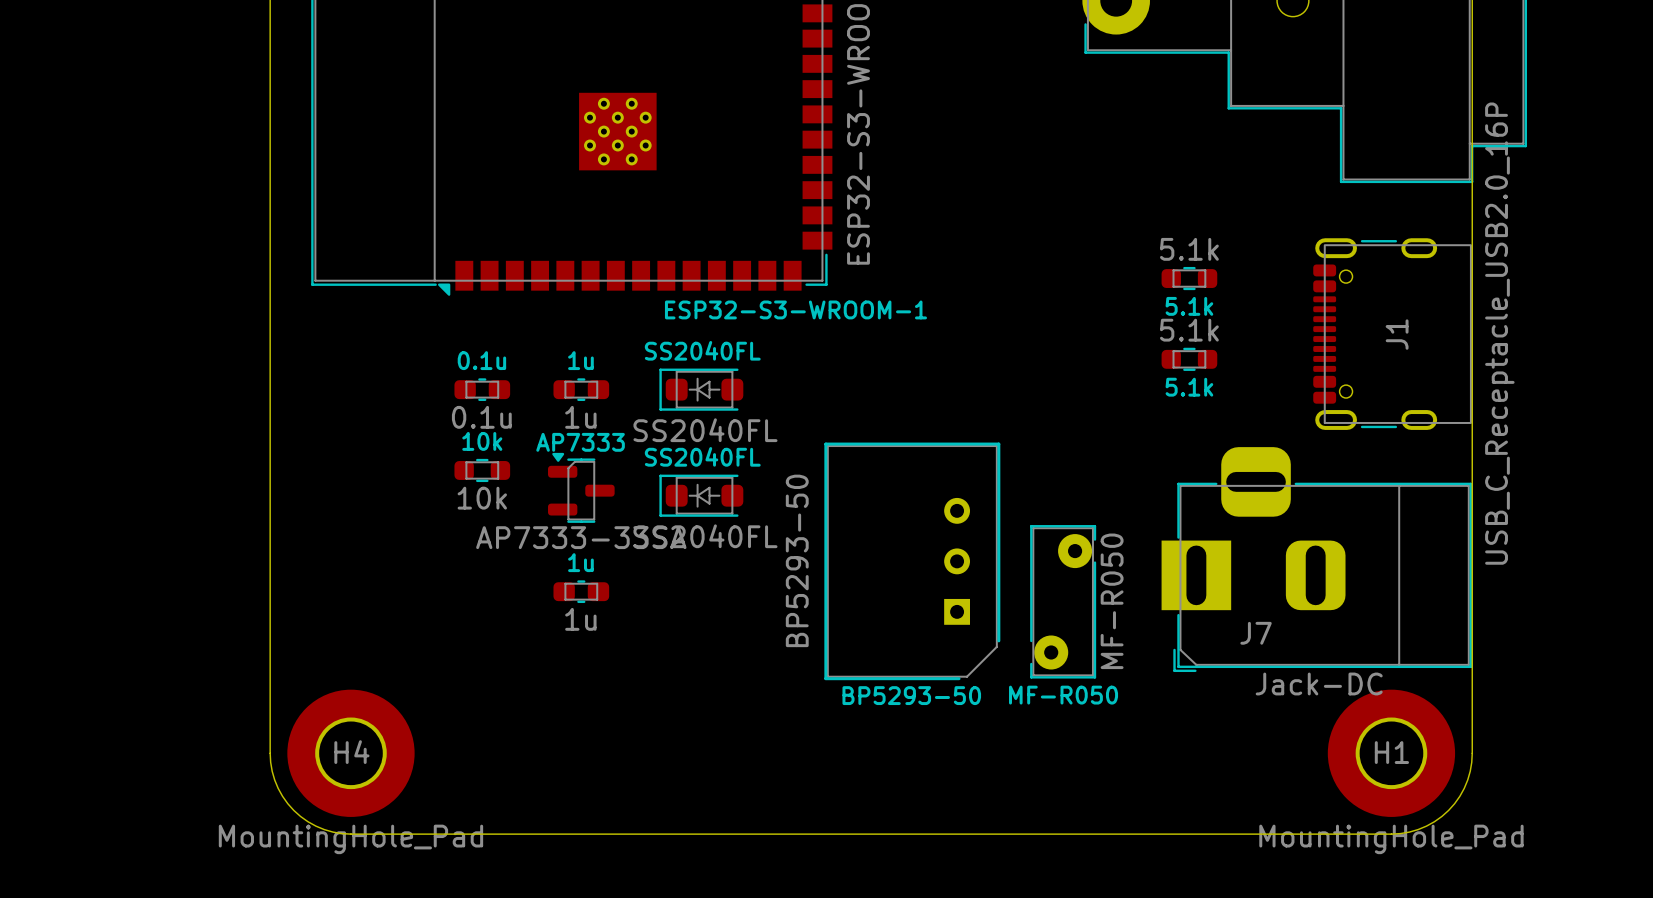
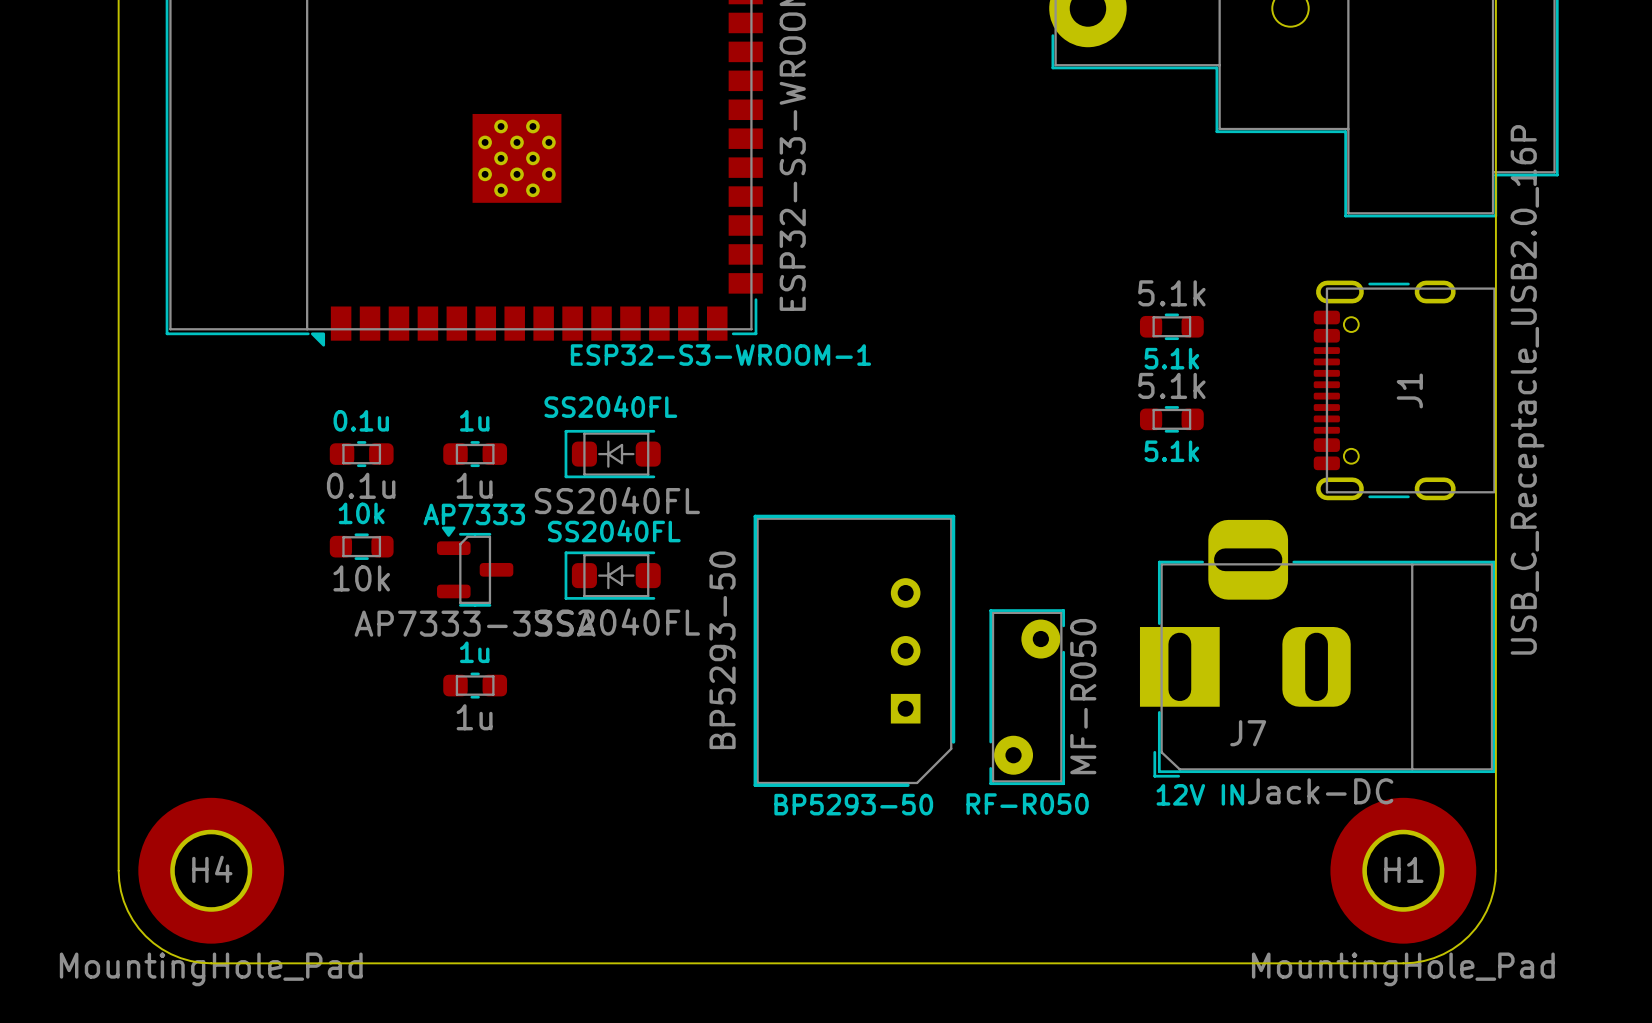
text: none -> ESP32-S3-WROOM-1 (720, 355)
ESP32-S3-WROOM-1 name: ESP32-S3-WROOM-1 (795, 309) -> none
text: none -> SS2040FL (610, 406)
SS2040FL name: SS2040FL (702, 350) -> none
text: none -> 12V IN (1200, 794)
MF-R050 name: MF-R050 (1063, 695) -> RF-R050 (1027, 804)

